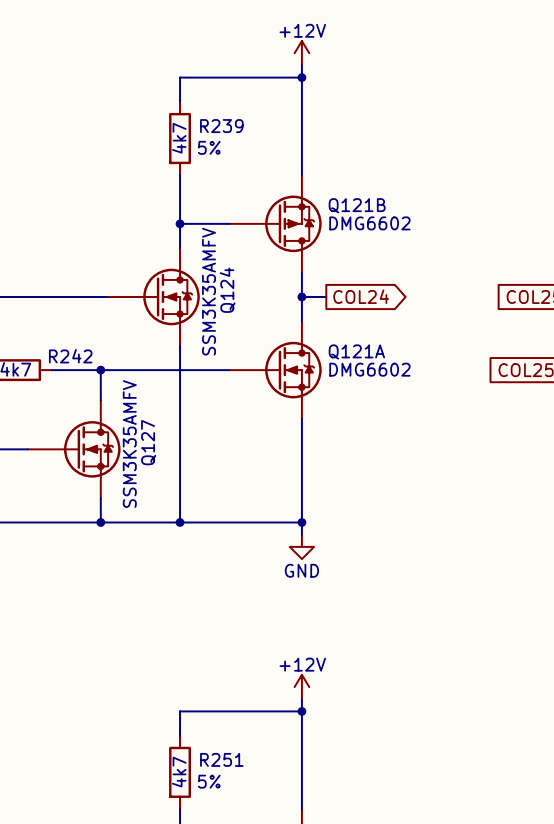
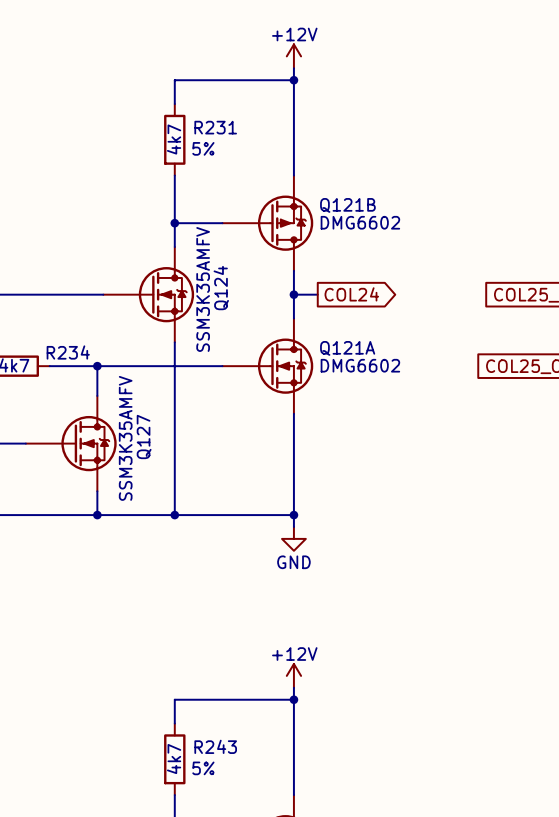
R239 name: R239 (221, 126) -> R231 (215, 127)
R242 name: R242 (70, 356) -> R234 (68, 352)
R251 name: R251 (221, 759) -> R243 (215, 746)

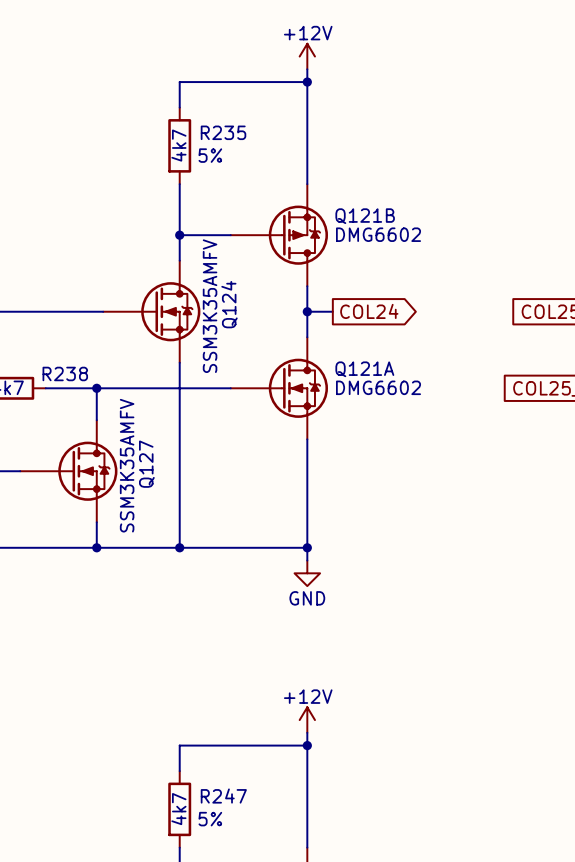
R231 name: R231 (215, 127) -> R235 (223, 132)
R234 name: R234 (68, 352) -> R238 (65, 373)
R243 name: R243 (215, 746) -> R247 (223, 796)

